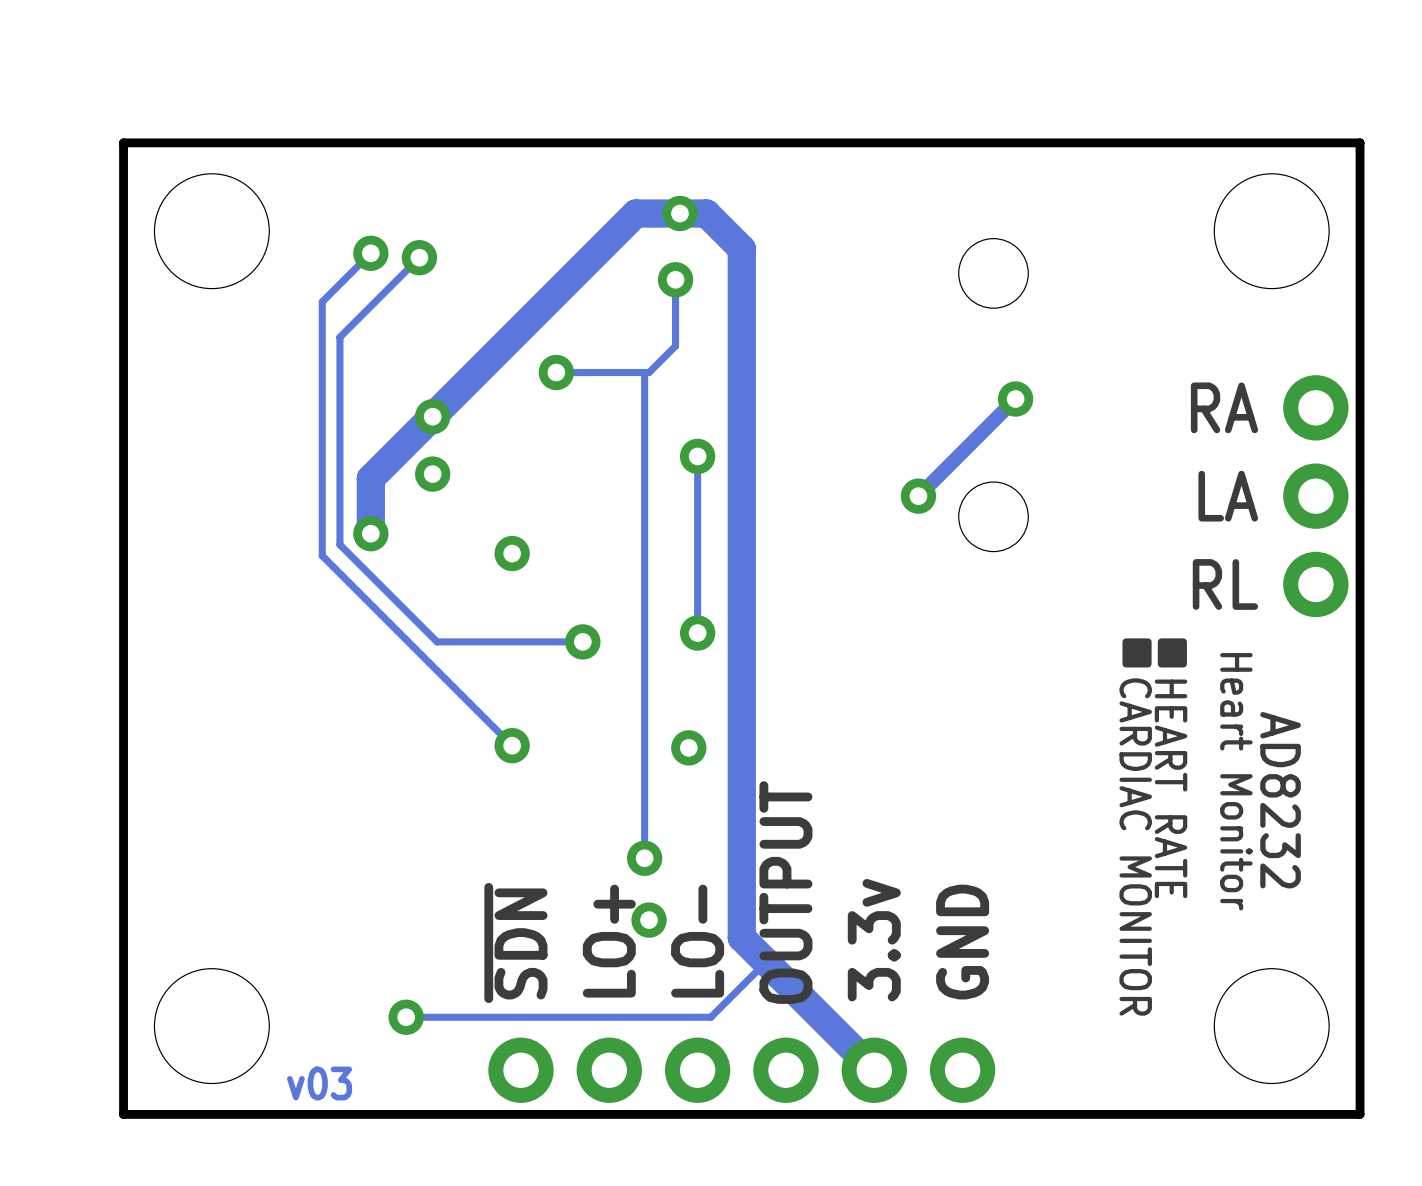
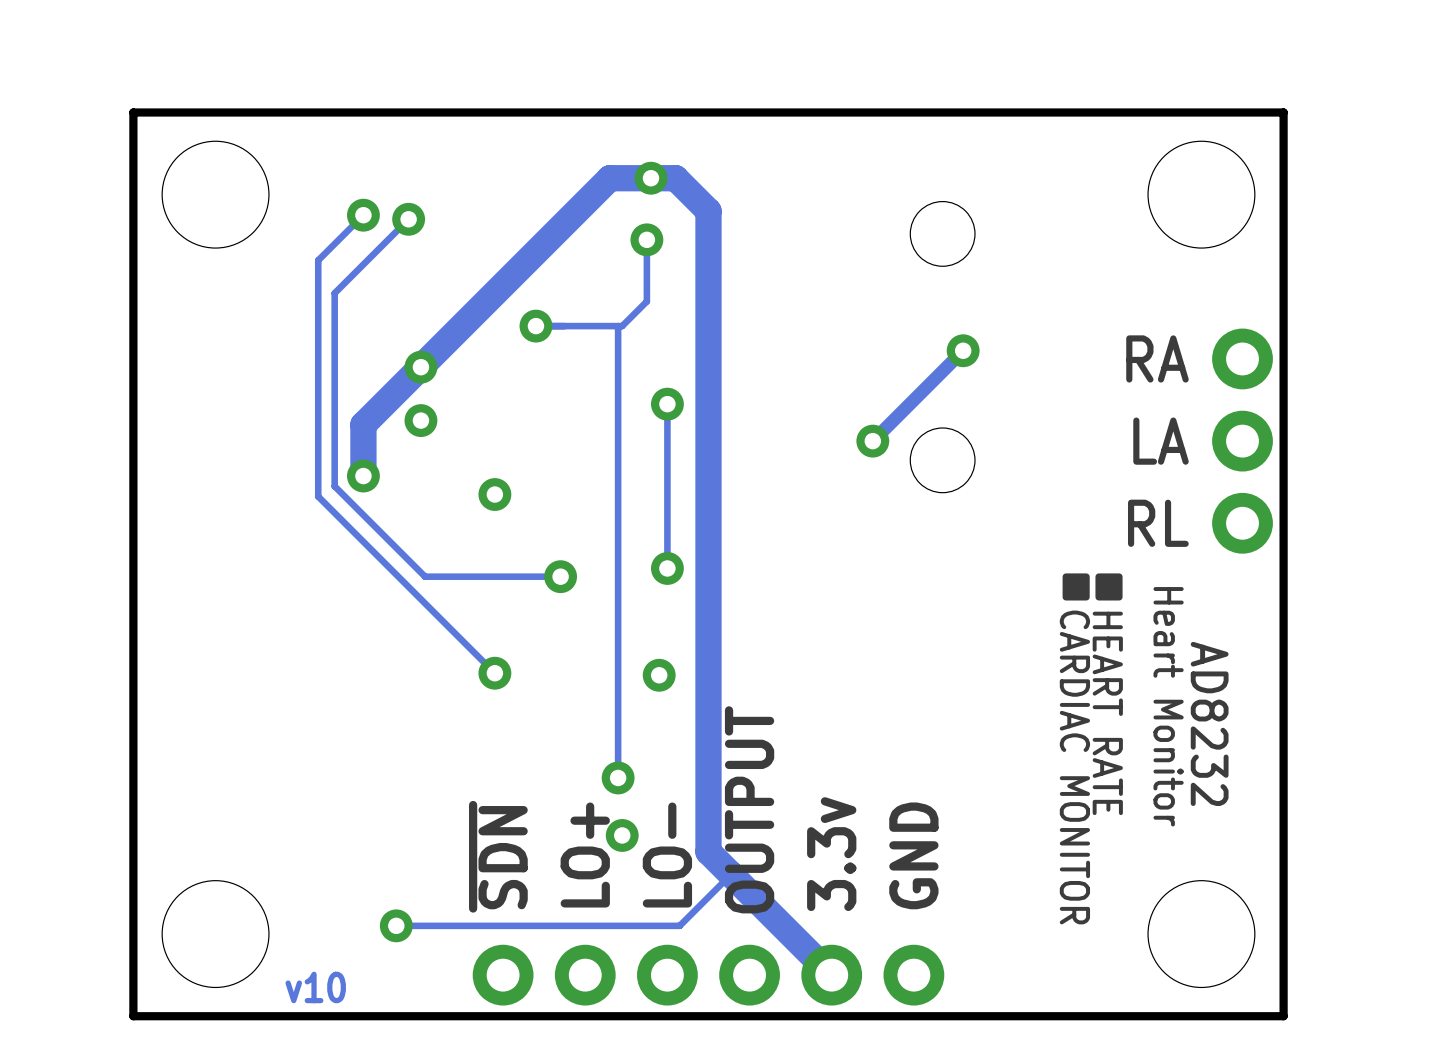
text: v03 (319, 1083) -> v10 (315, 987)

